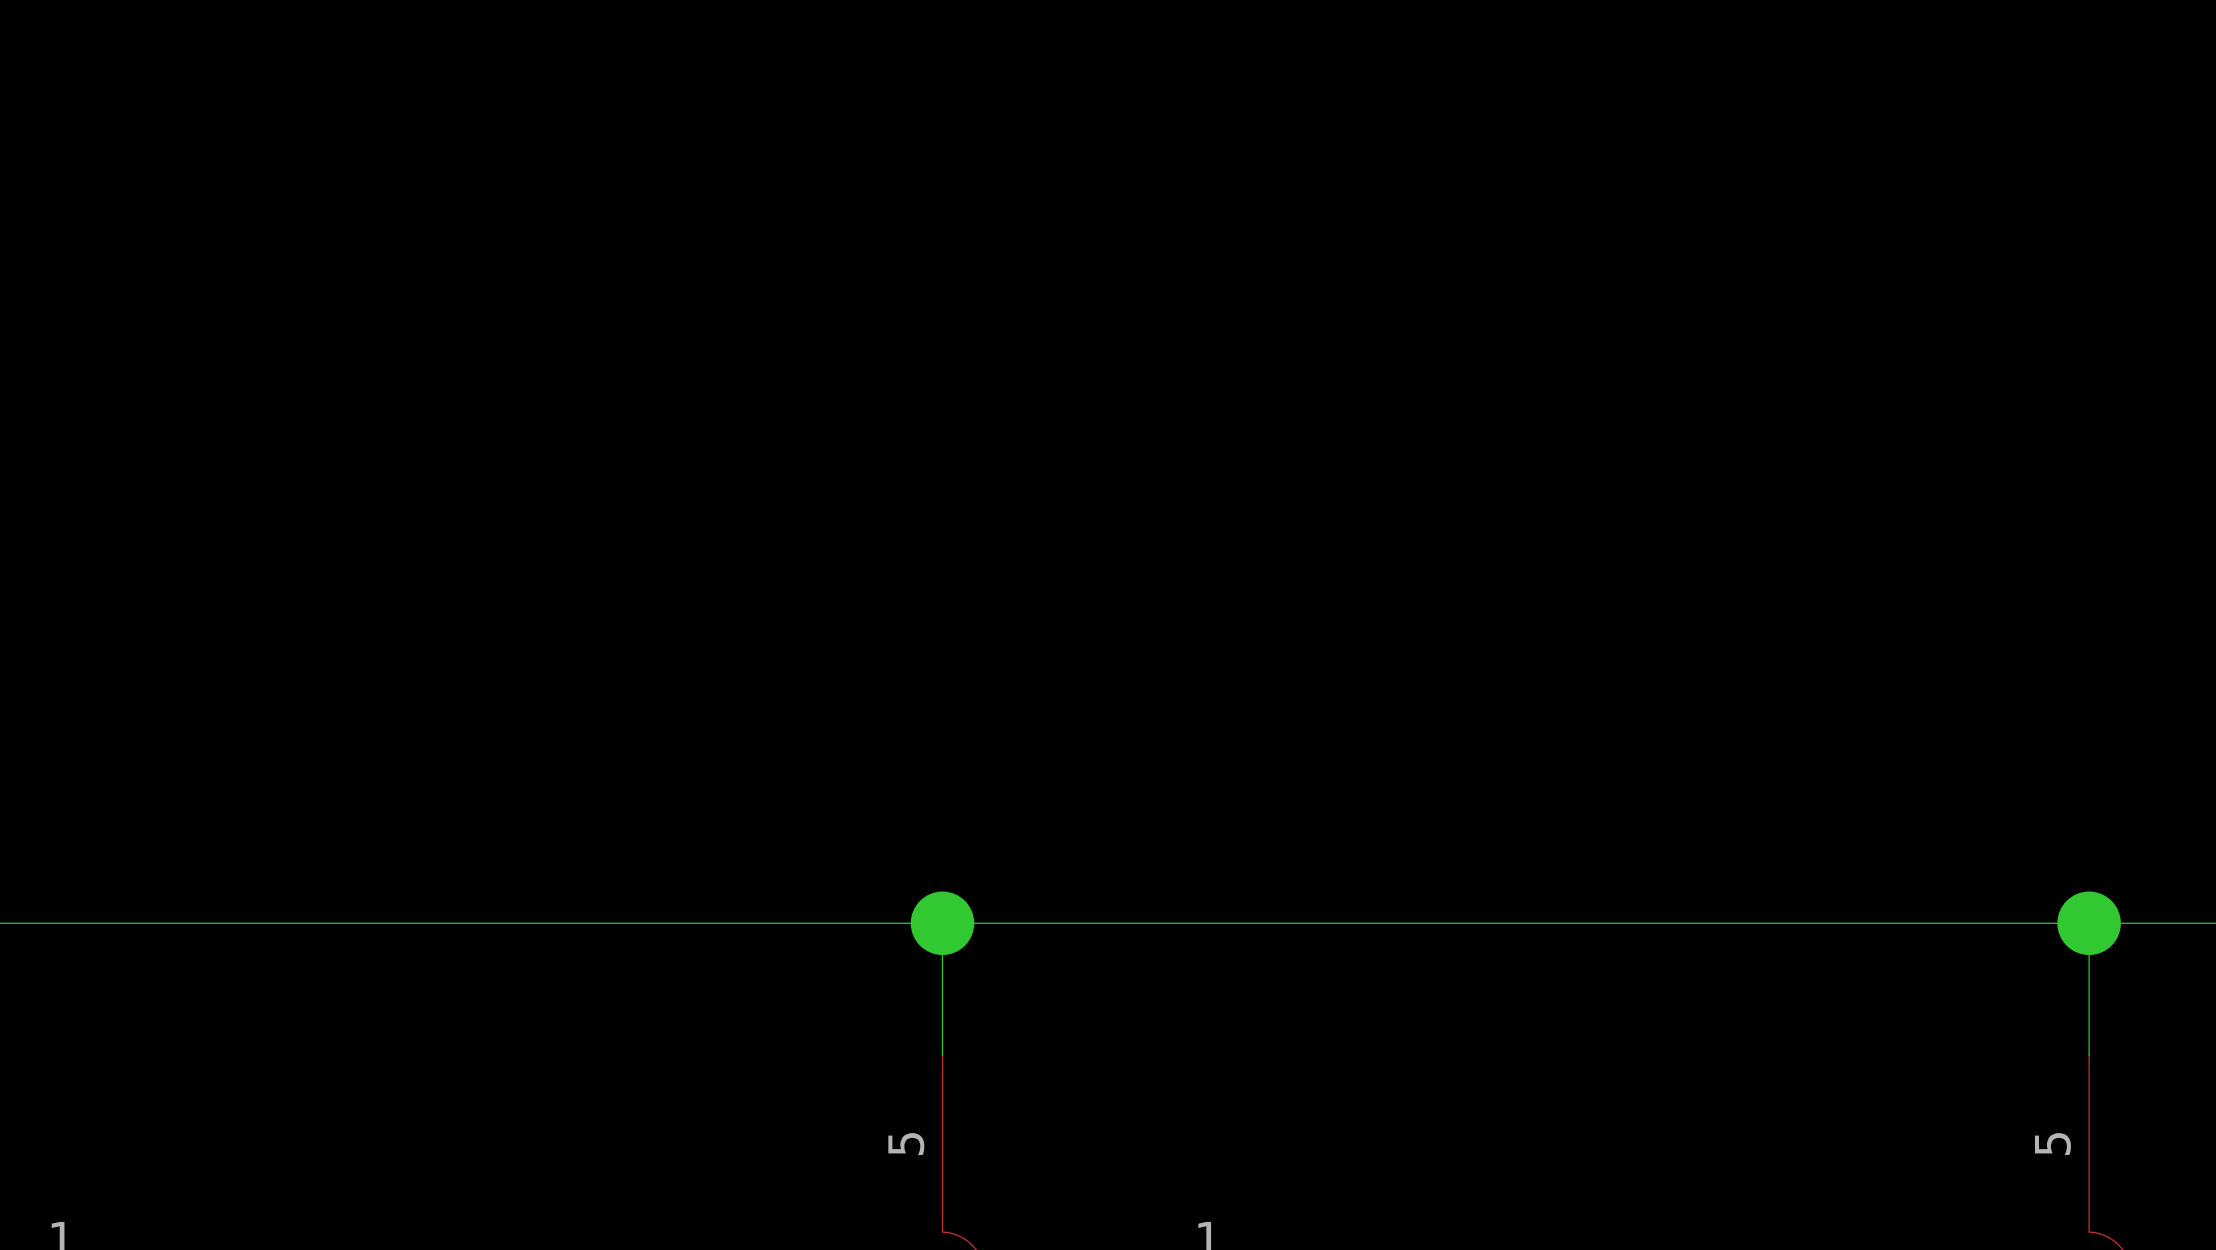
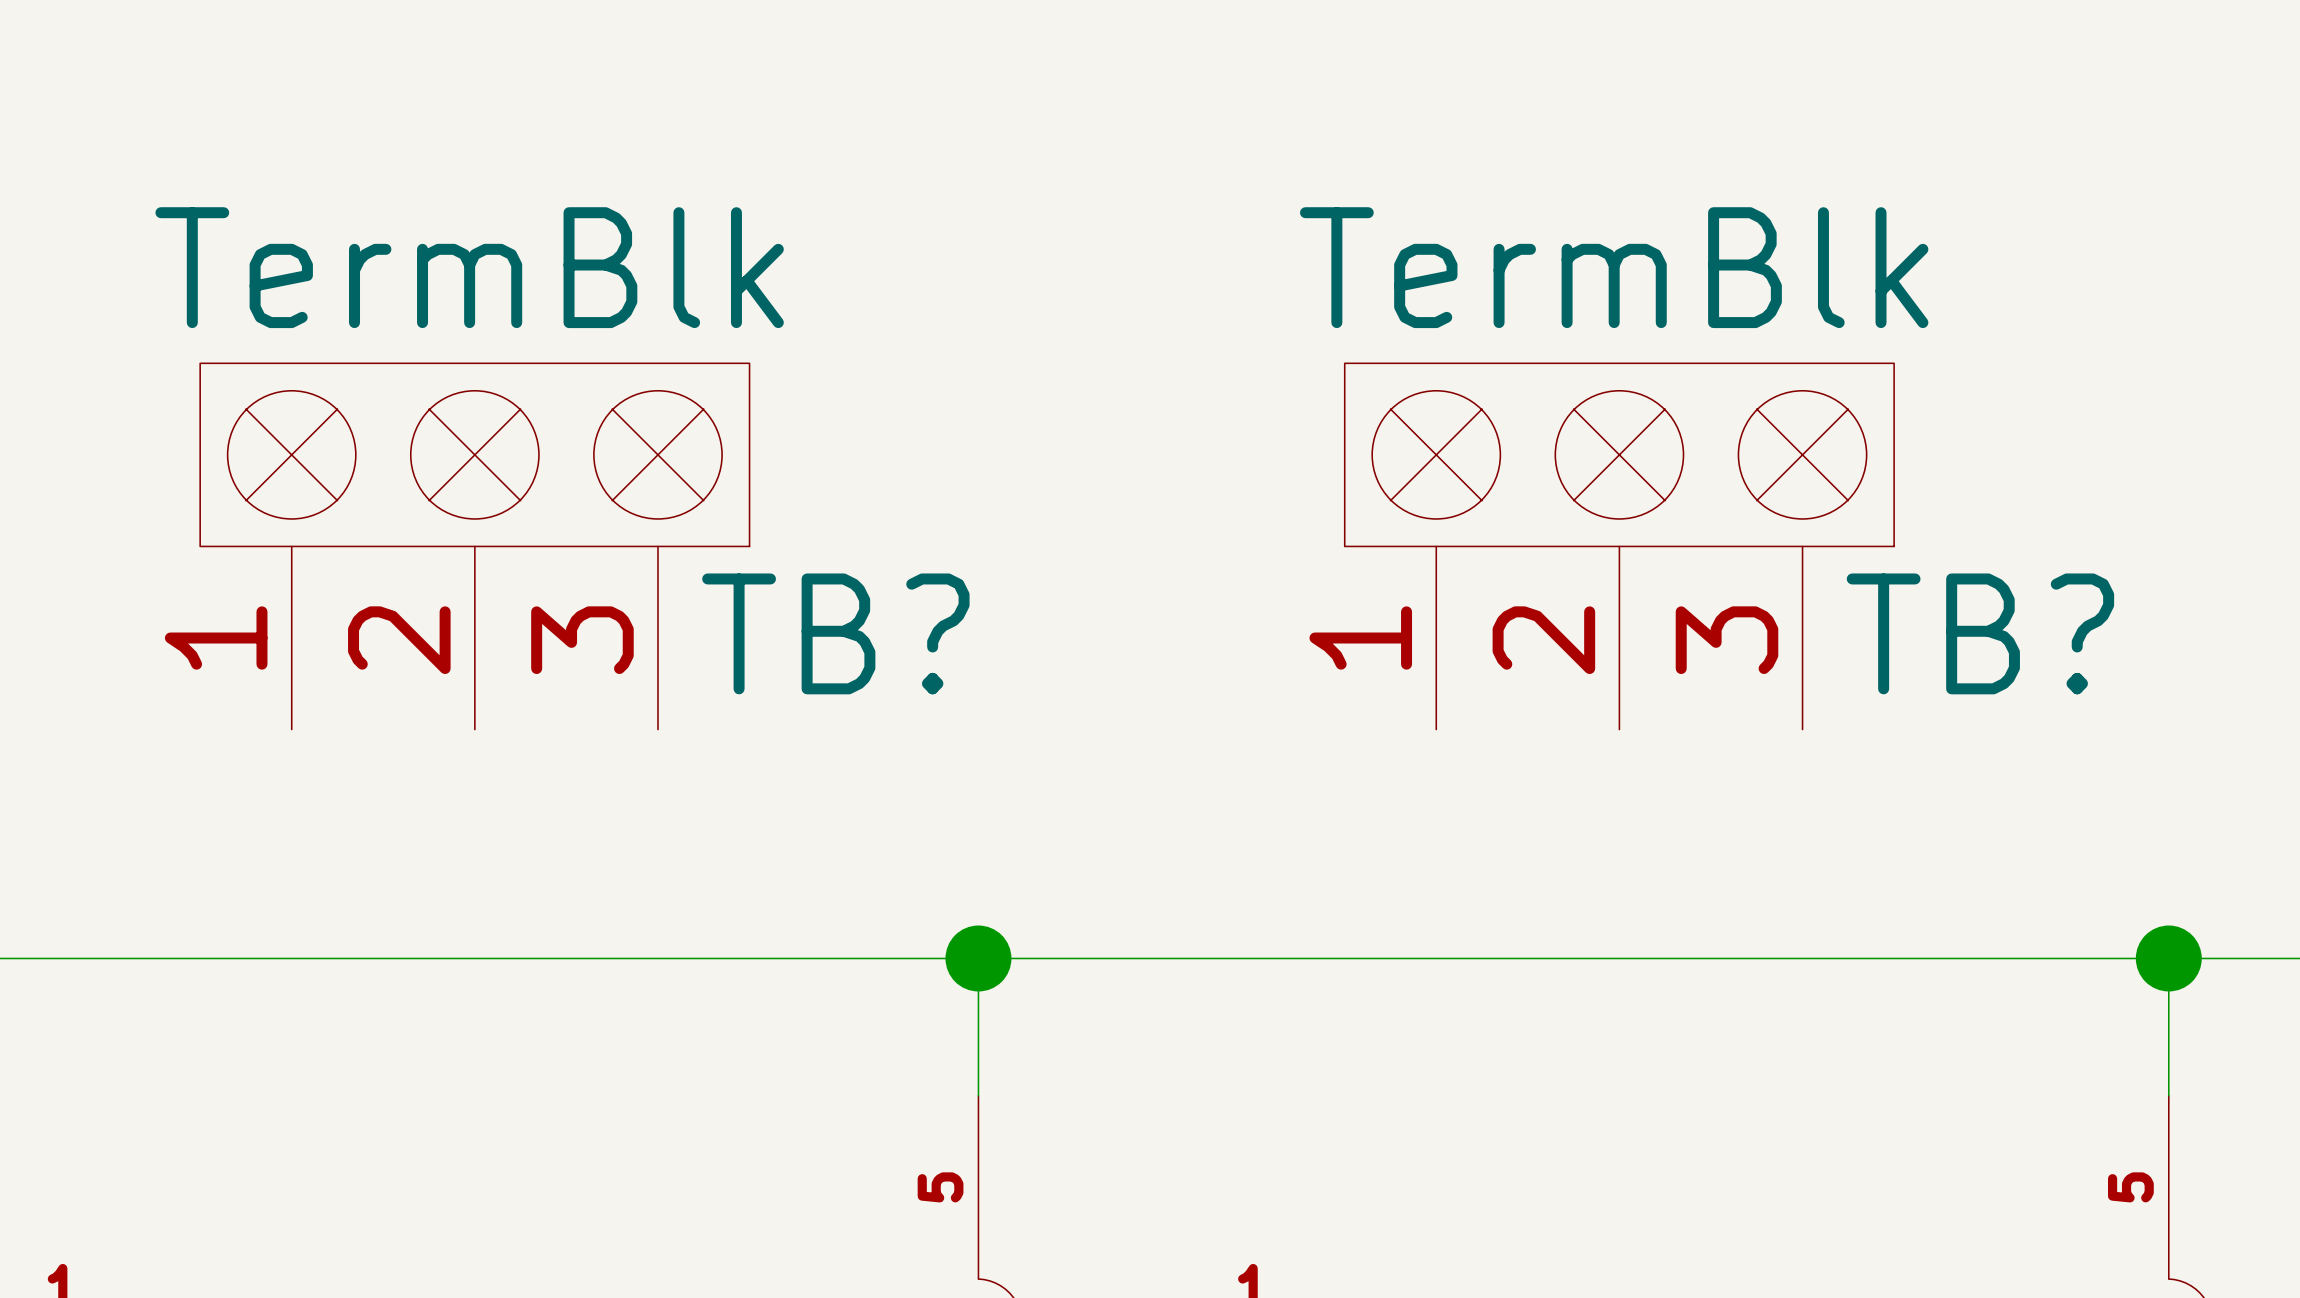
TB?: none -> TermBlk (474, 546)
TB?: none -> TermBlk (1619, 546)

